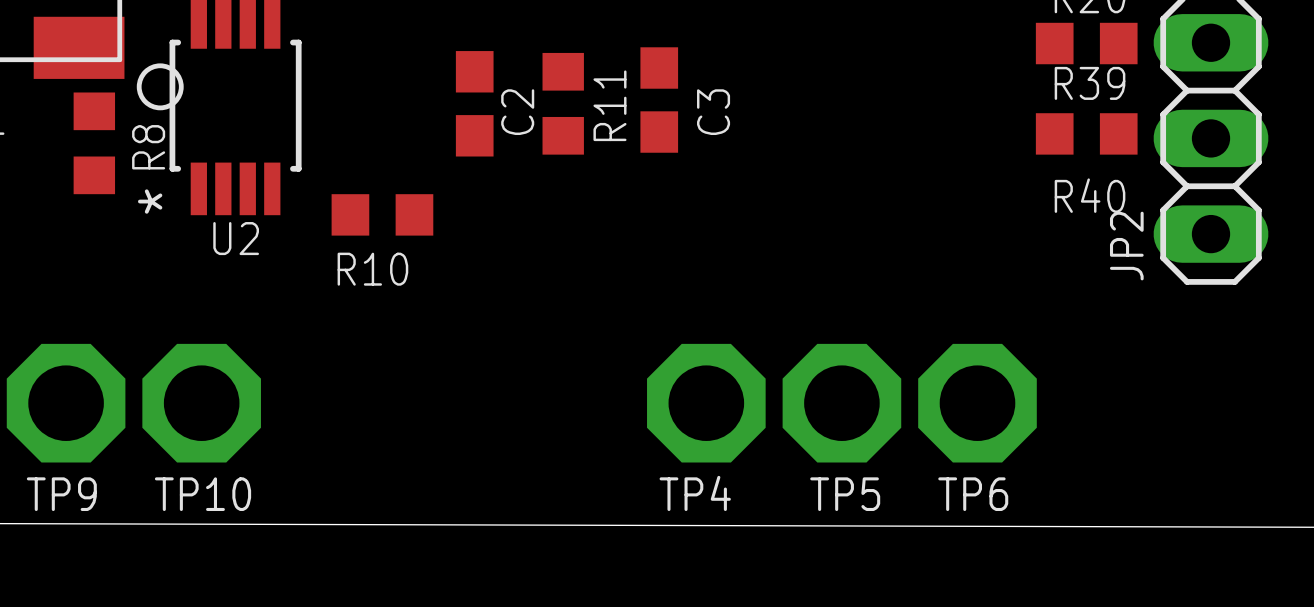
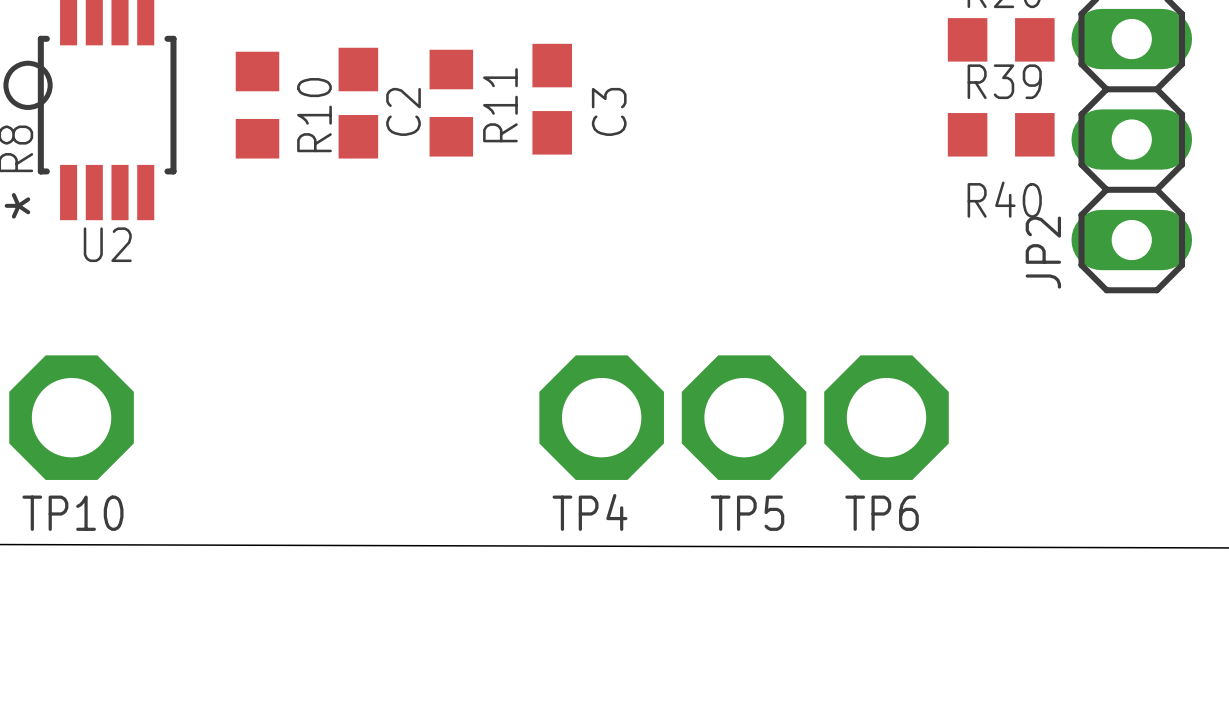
R10 rotation: 0° (382, 214) -> 90° clockwise (257, 105)
R10 position: (382, 214) -> (257, 105)
R10 name position: R10 (372, 269) -> R10 (314, 115)

